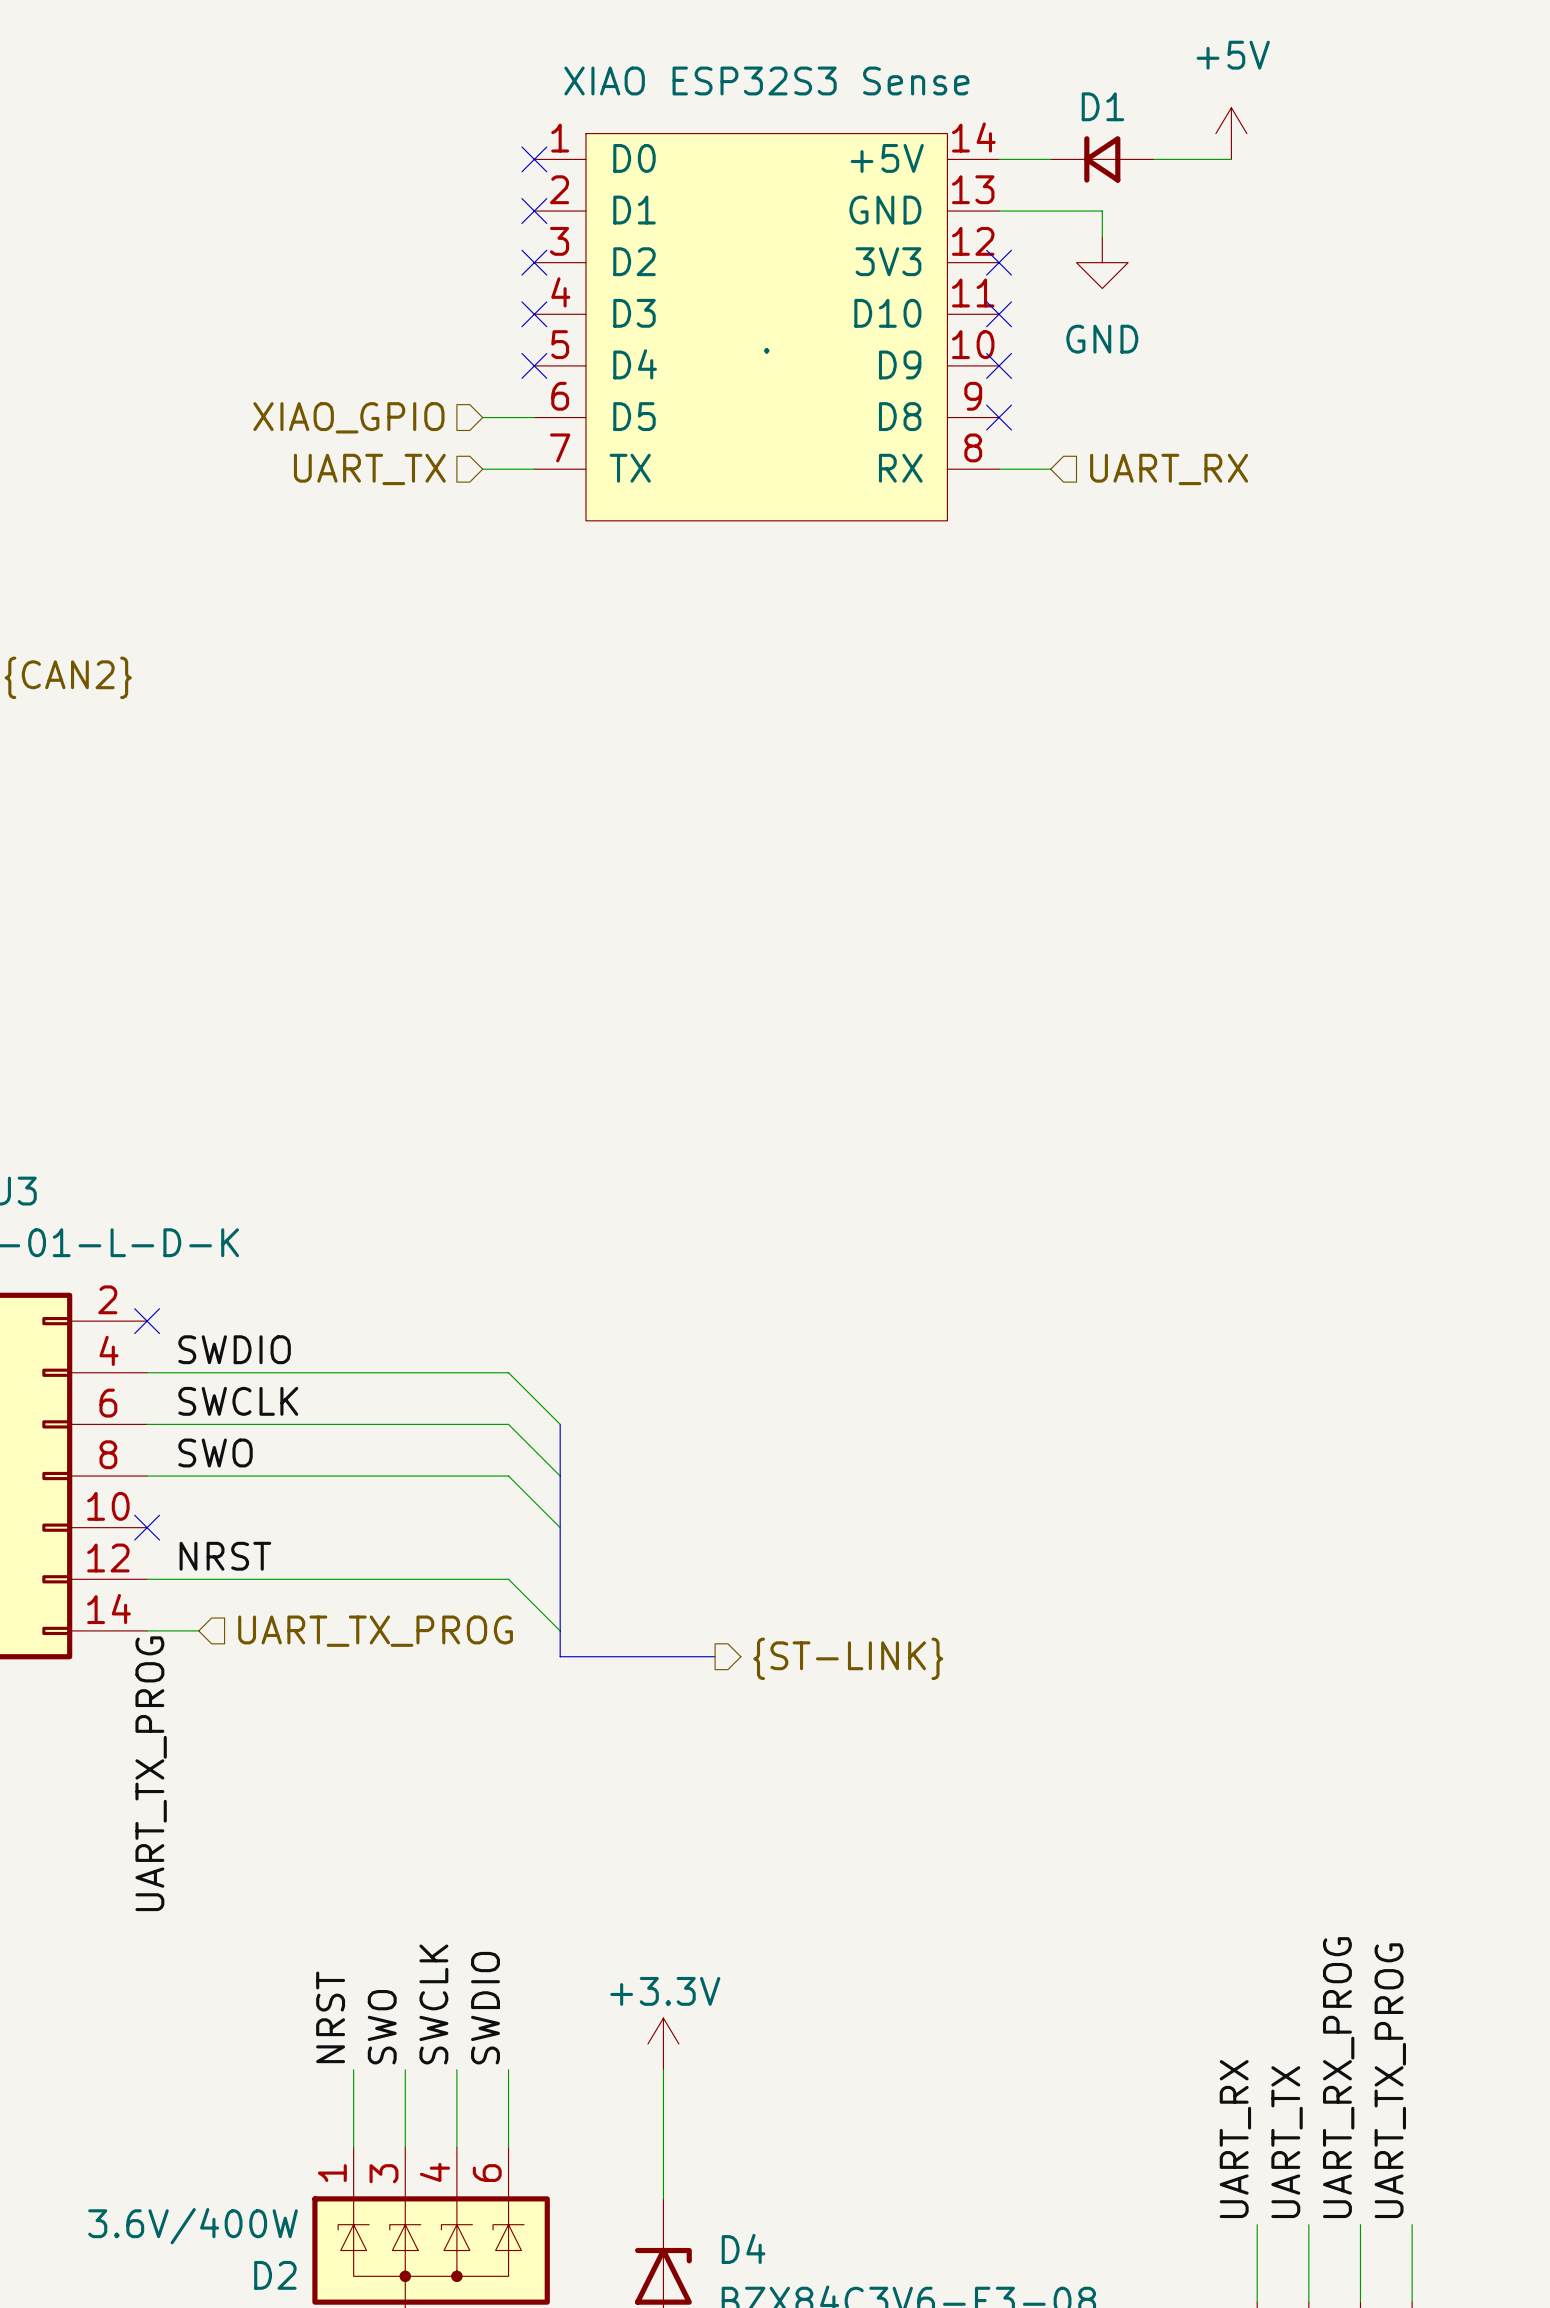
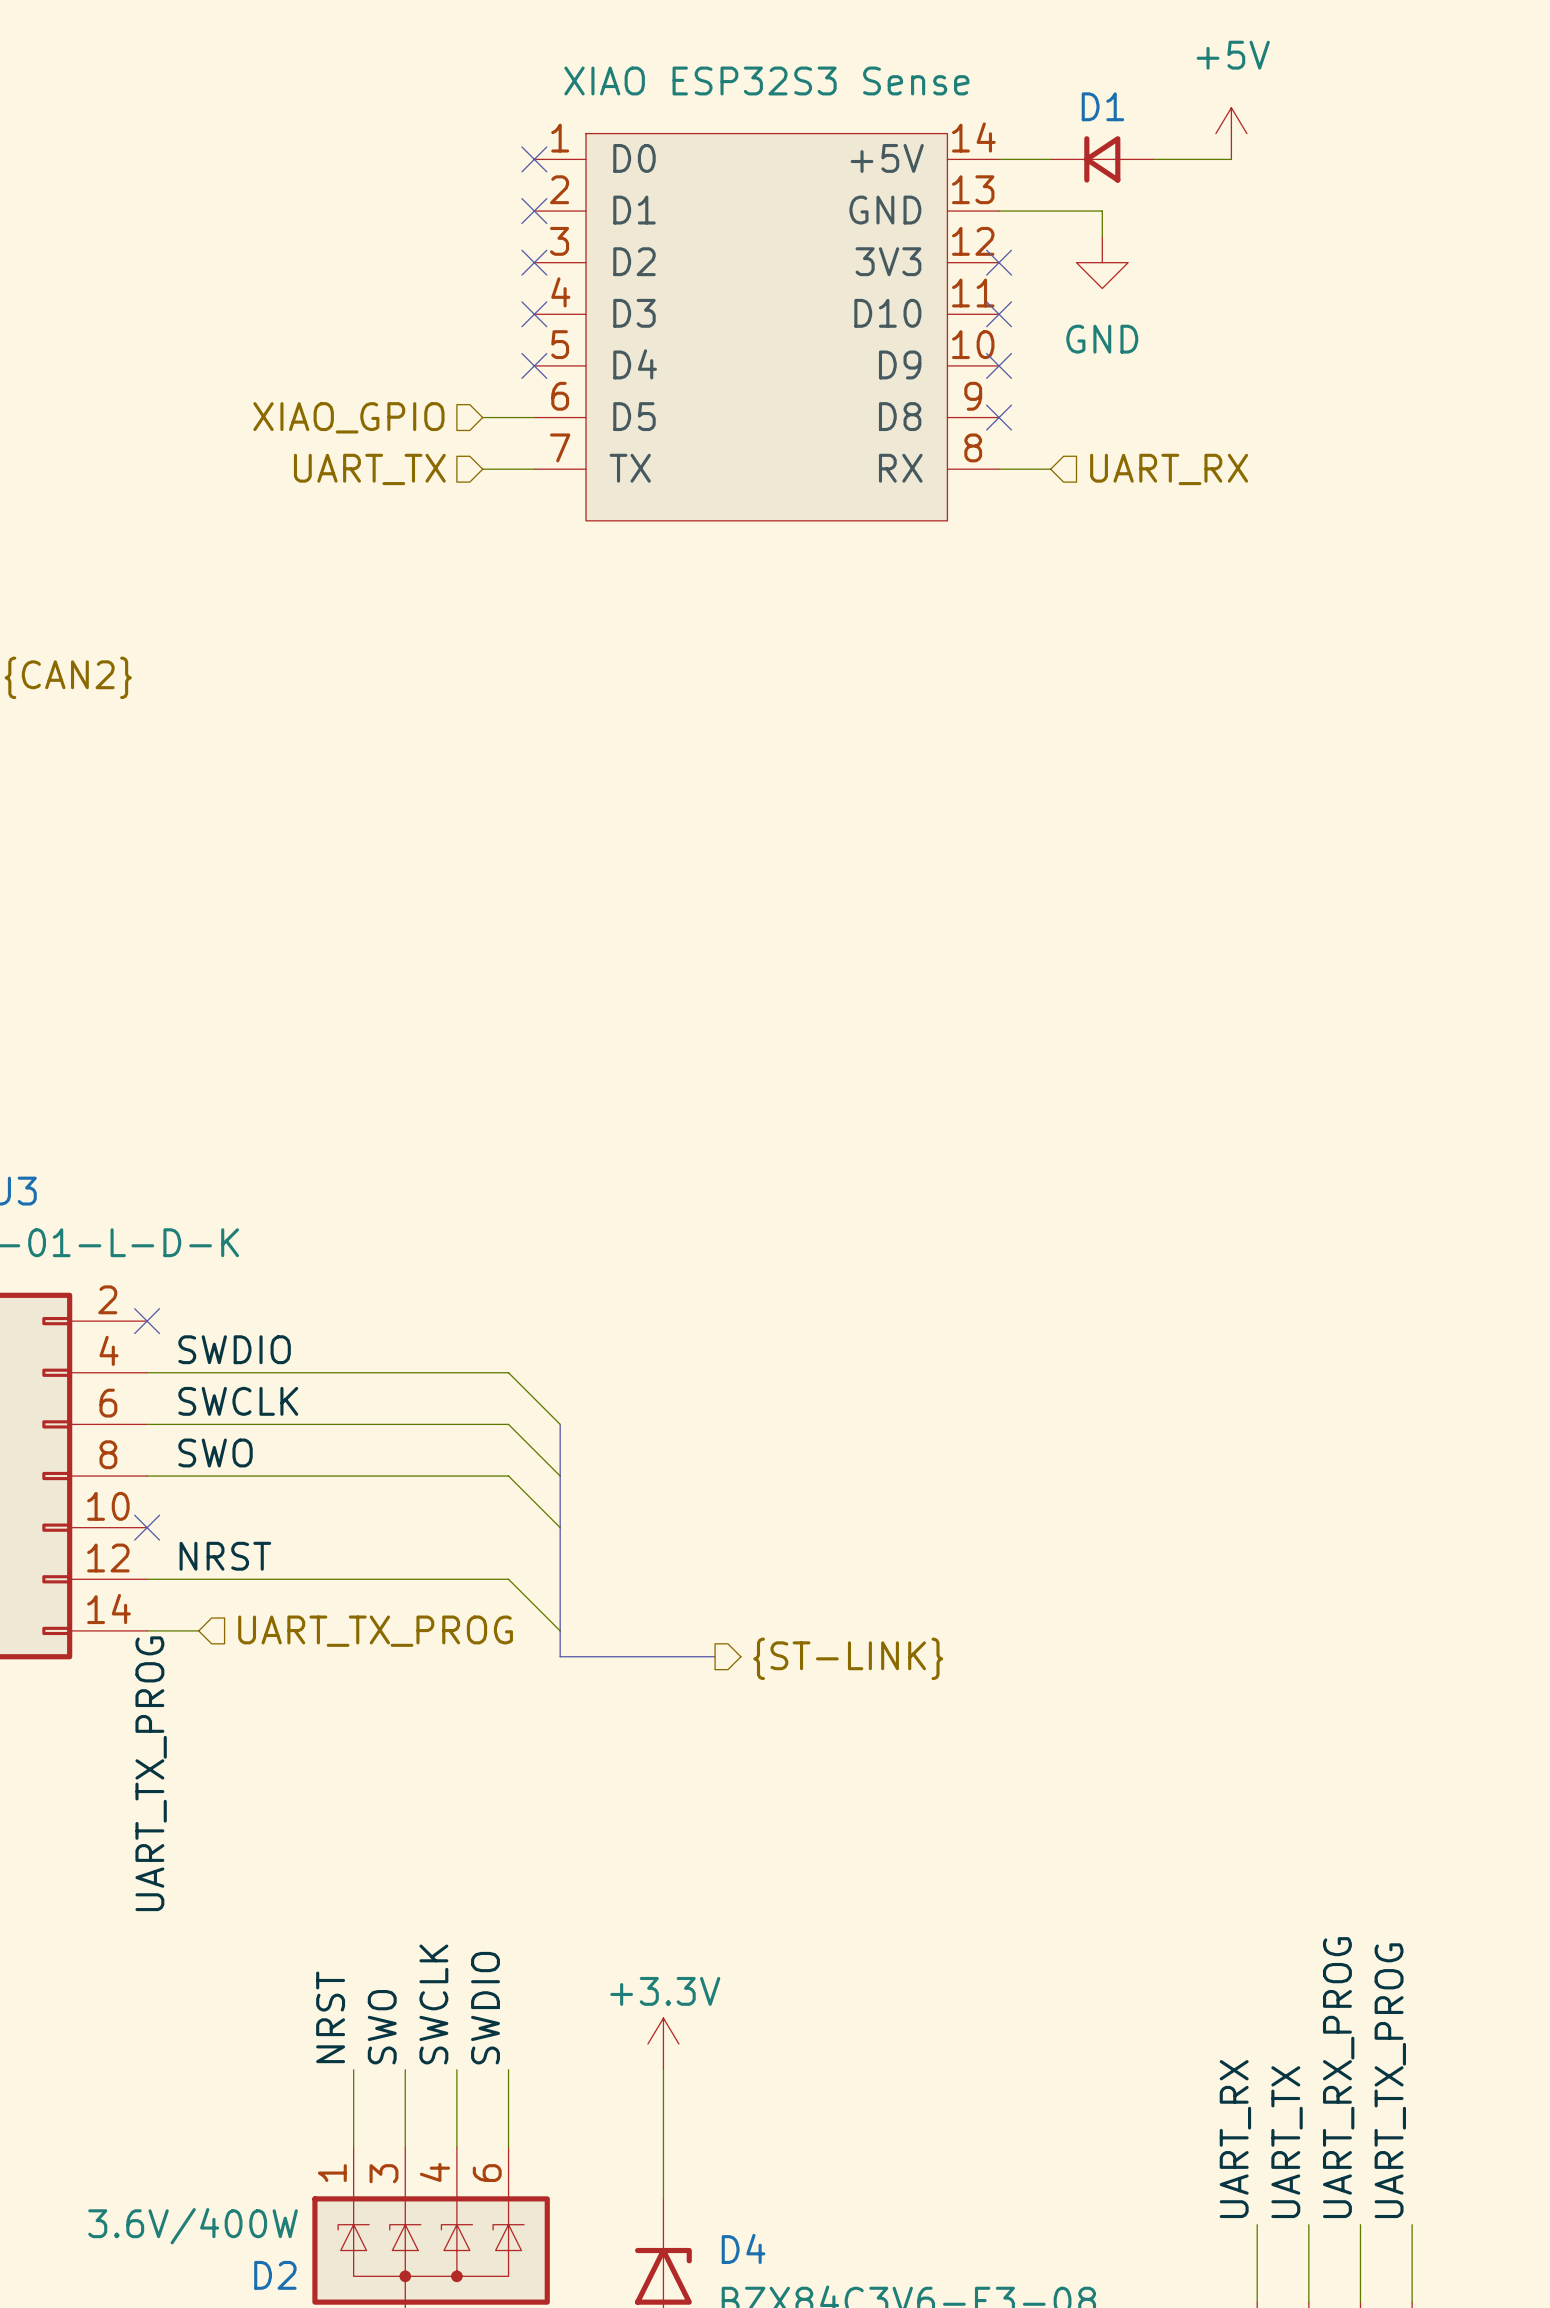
part text: . (766, 350) -> none

